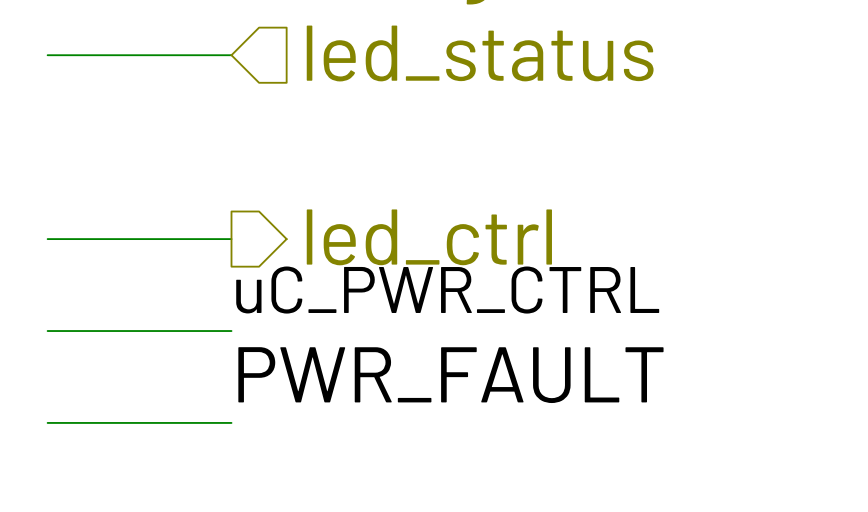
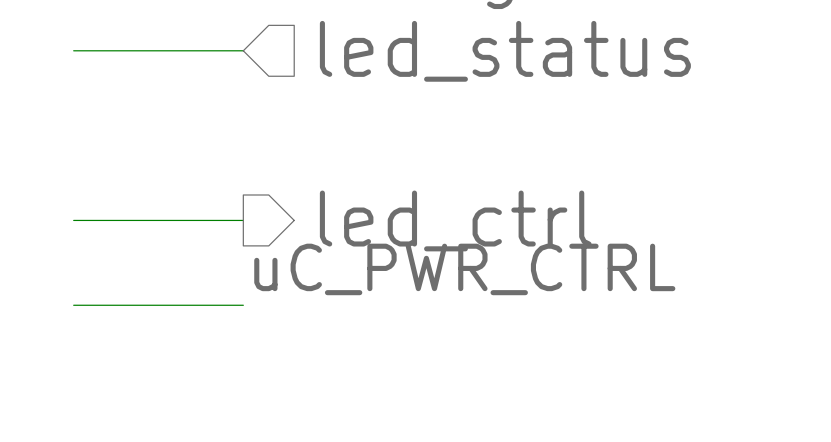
label: PWR_FAULT (450, 375) -> none
wire: (47, 422) (231, 422) -> none

